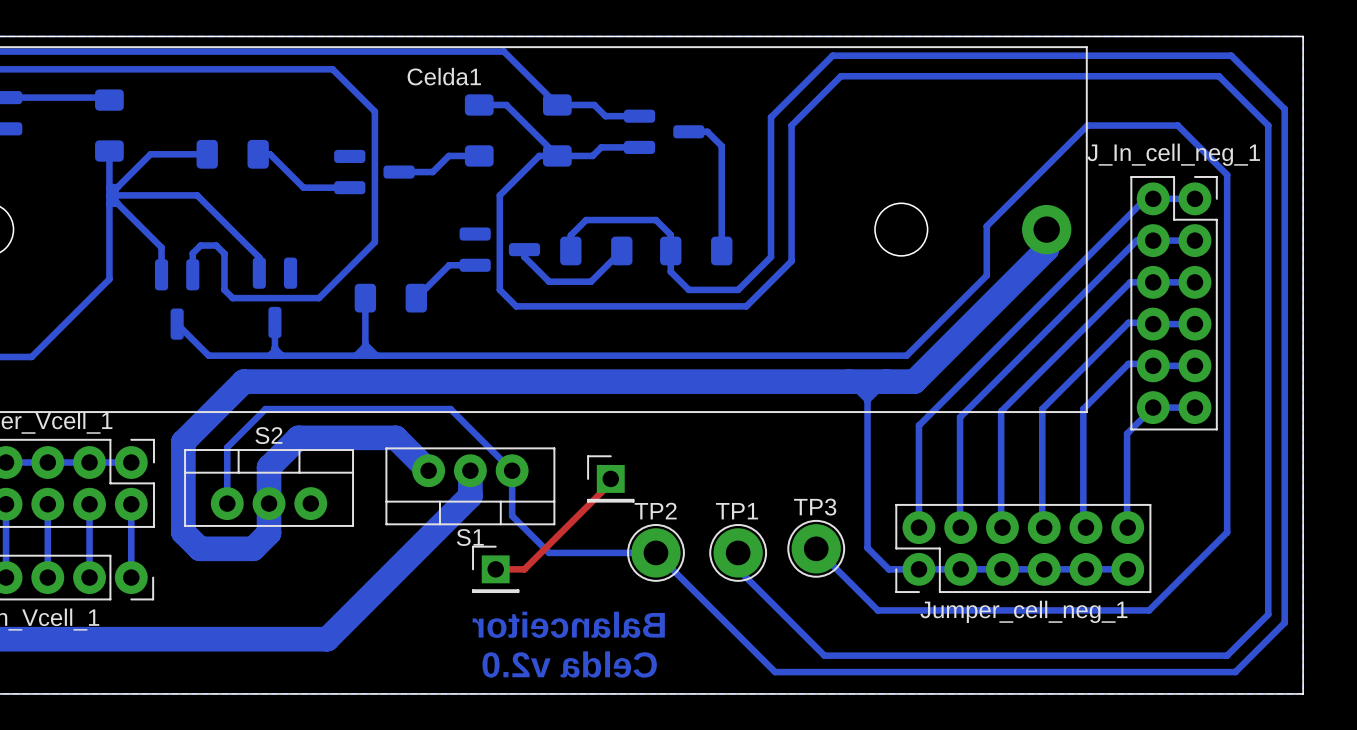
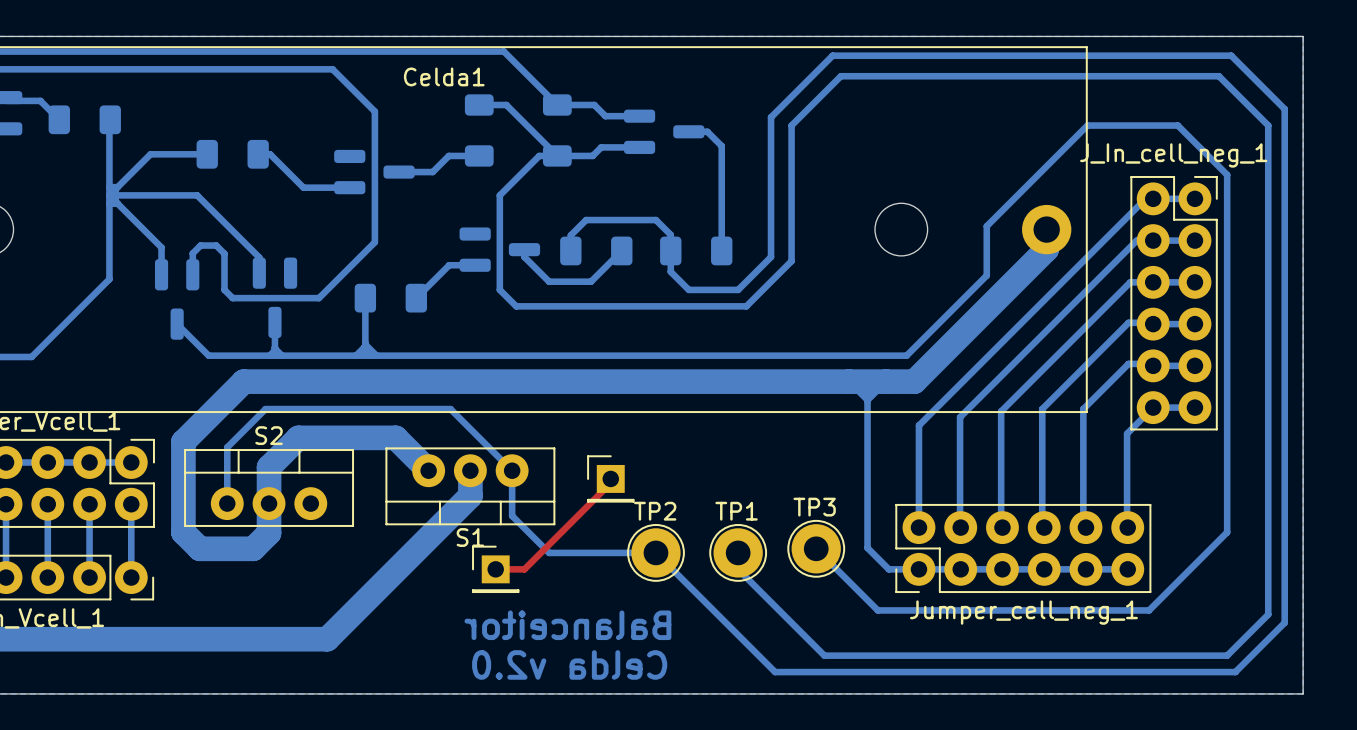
bottom track: (6, 97) (106, 97) (109, 100) -> none
bottom track: none -> (6, 100) (40, 100) (59, 119)
bottom track: none -> (109, 120) (109, 151)
part rotation: 0° (109, 125) -> 90° clockwise (84, 119)

